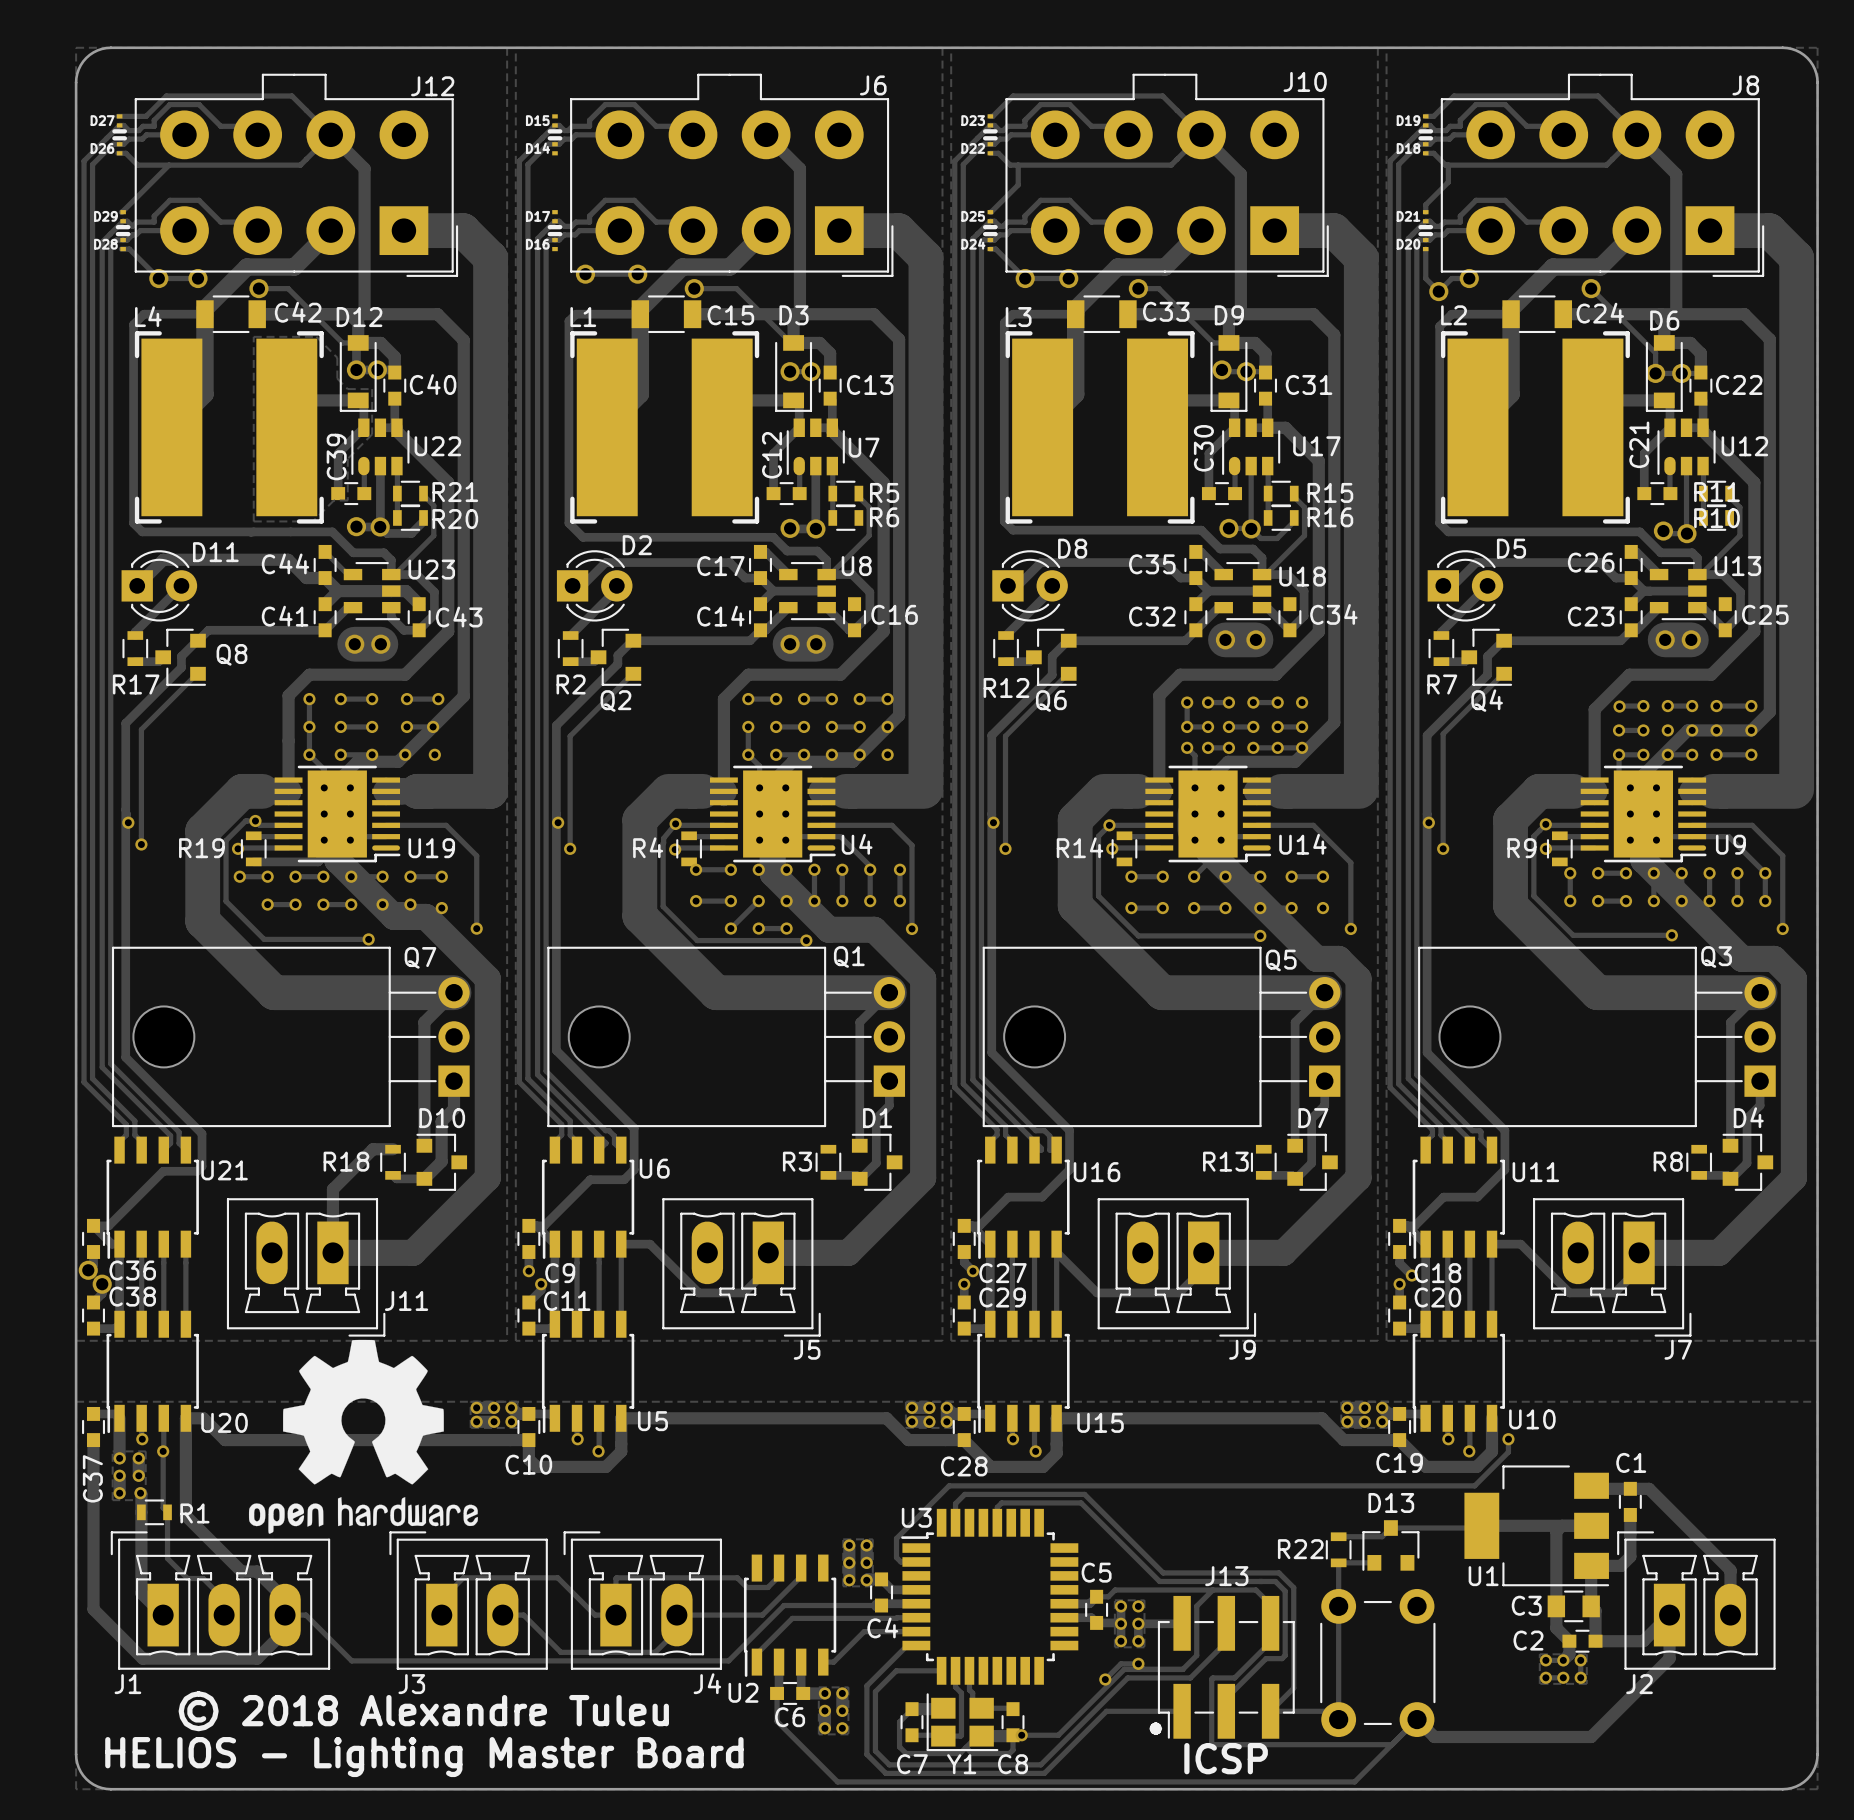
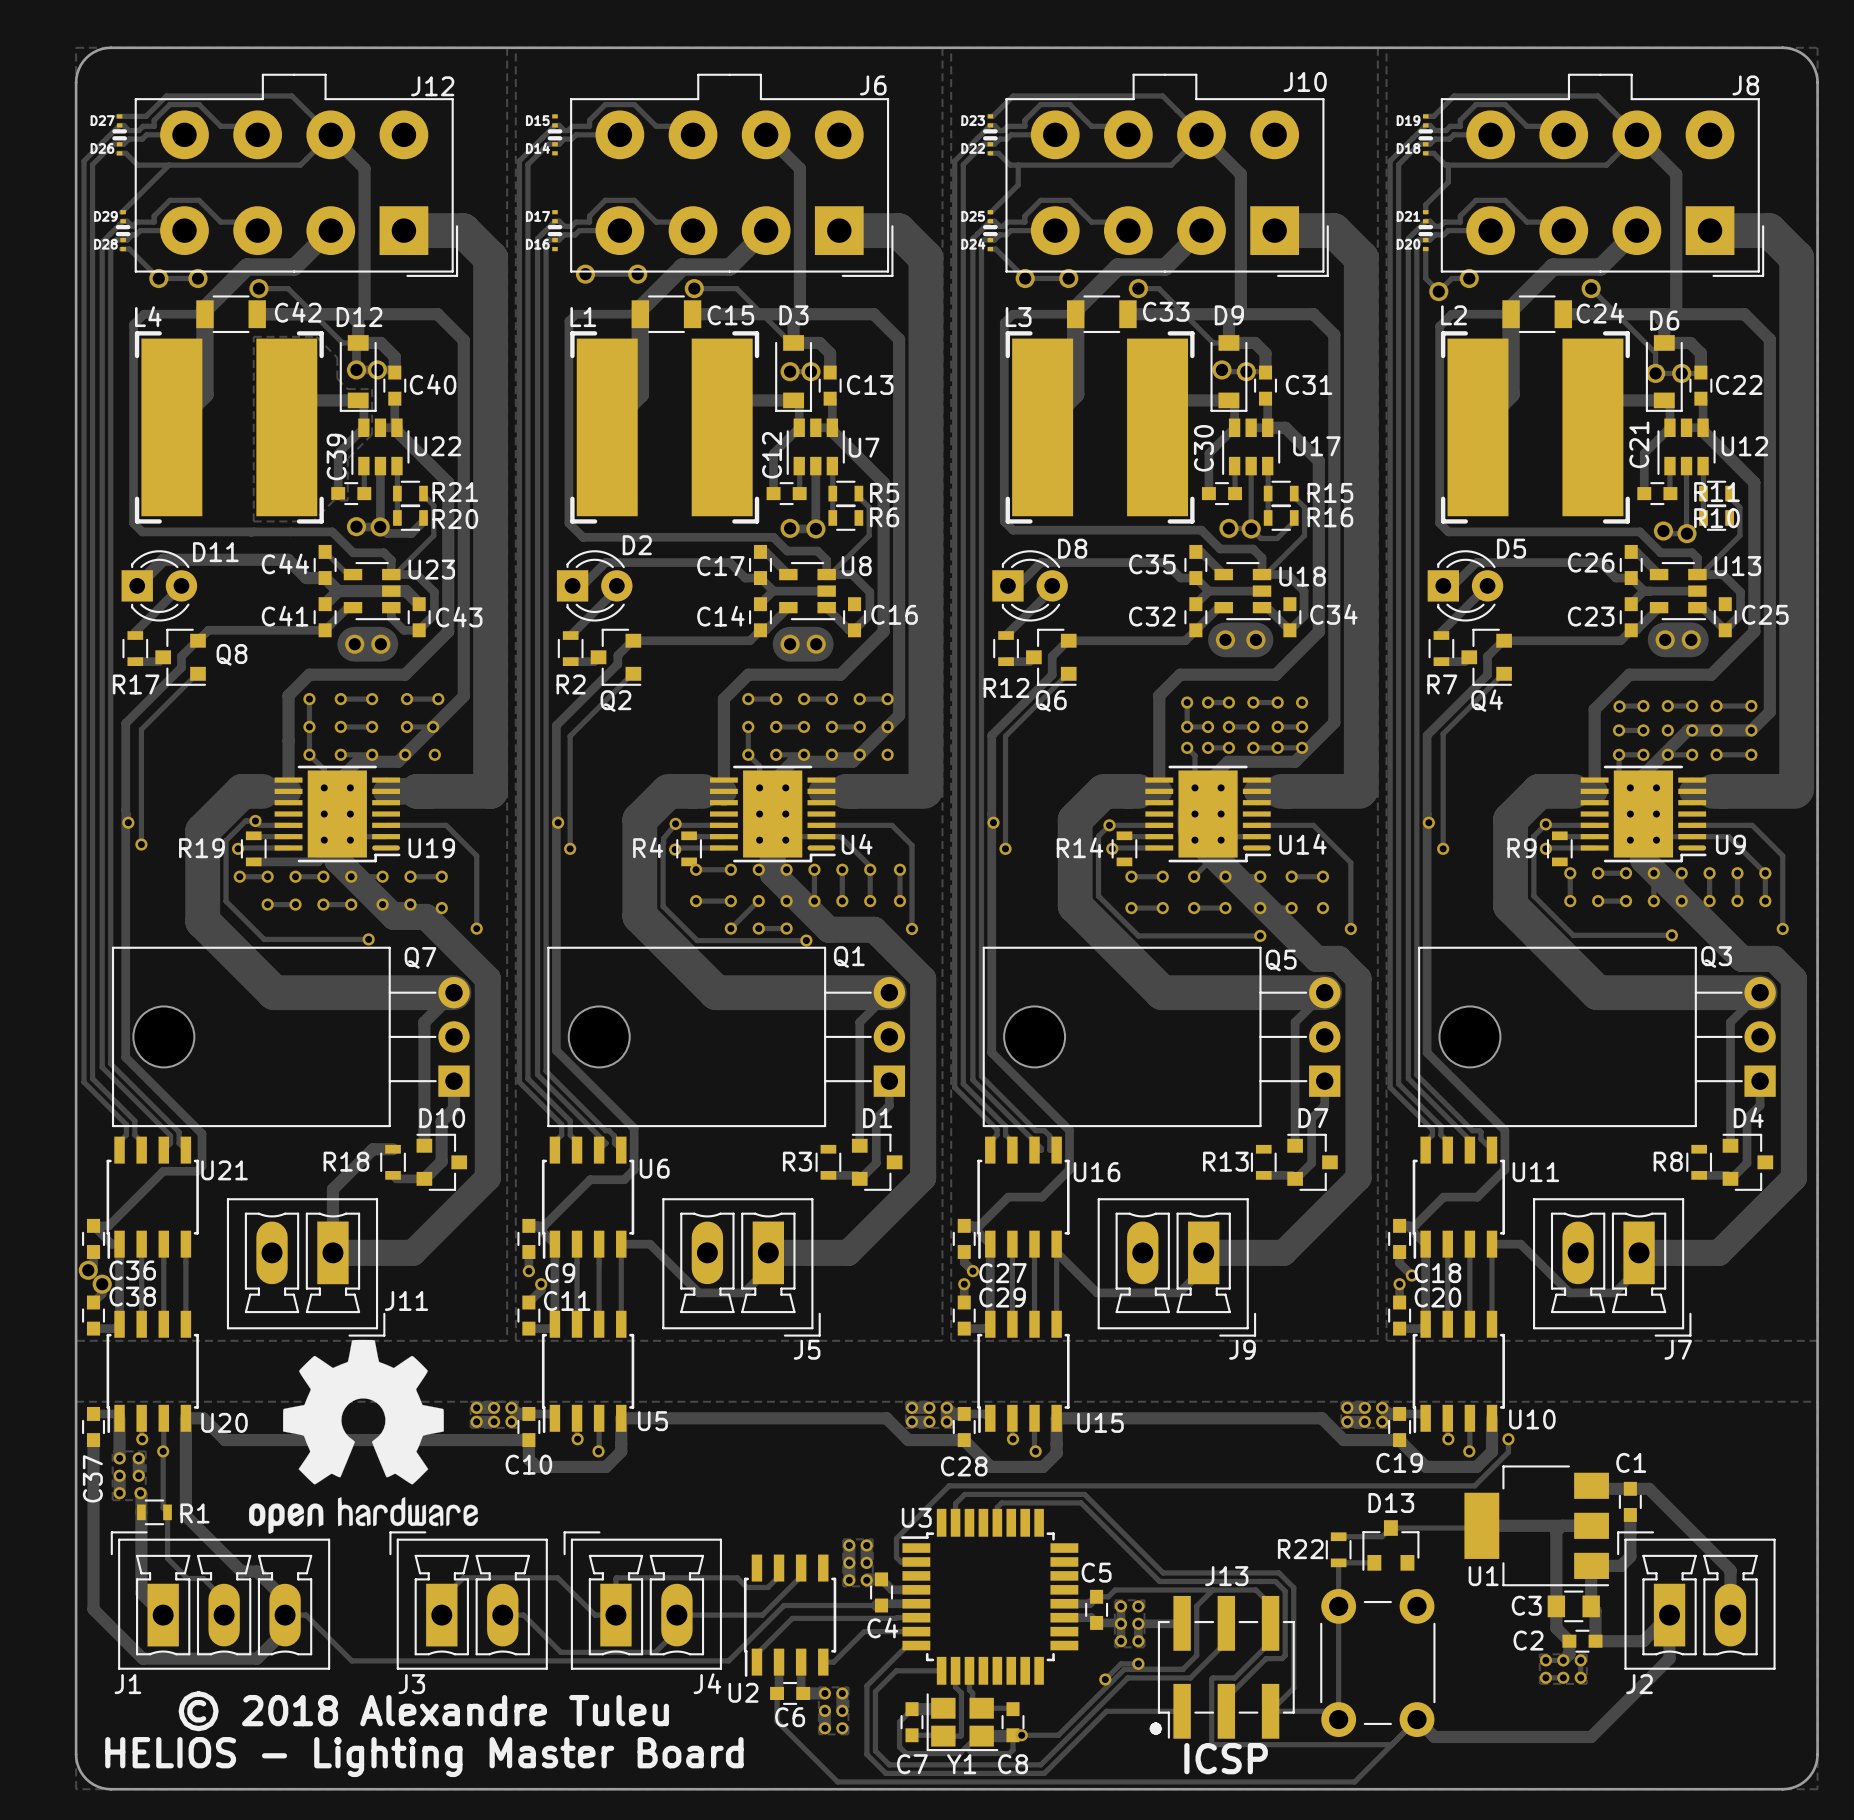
U22 footprint: [351, 418, 410, 476] -> [351, 418, 410, 476]
U7 footprint: [786, 418, 845, 476] -> [786, 418, 845, 476]
U17 footprint: [1222, 418, 1281, 476] -> [1222, 418, 1281, 476]
U12 footprint: [1657, 418, 1716, 476] -> [1657, 418, 1716, 476]

